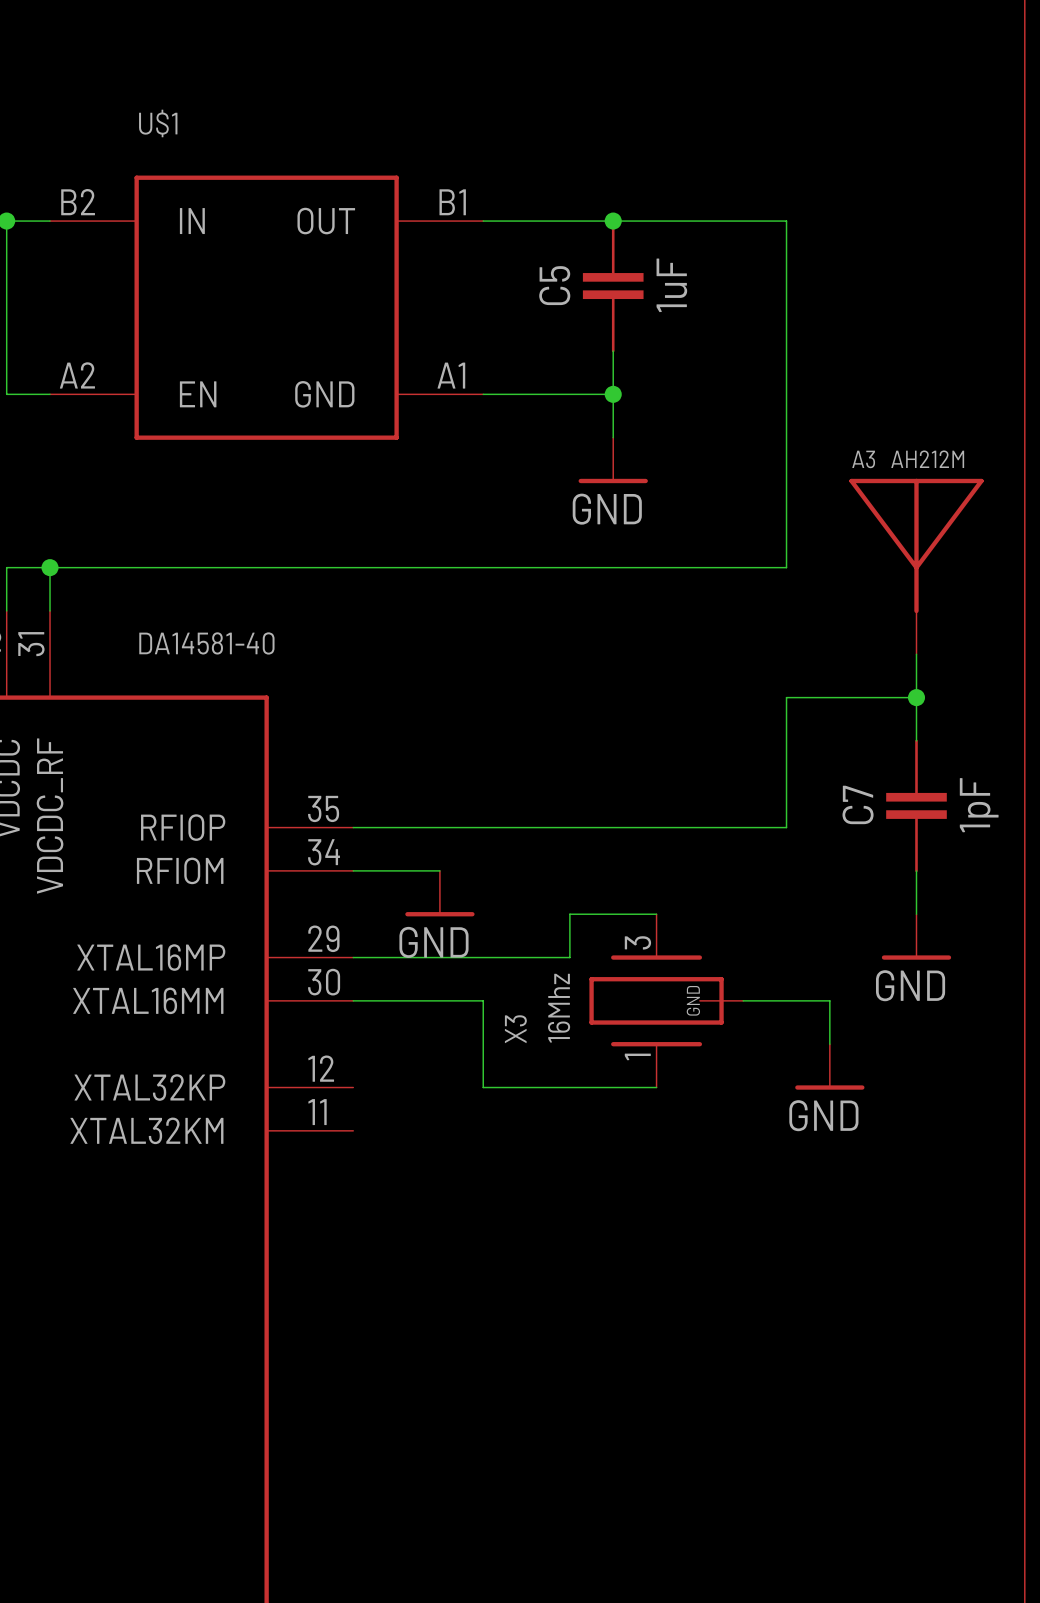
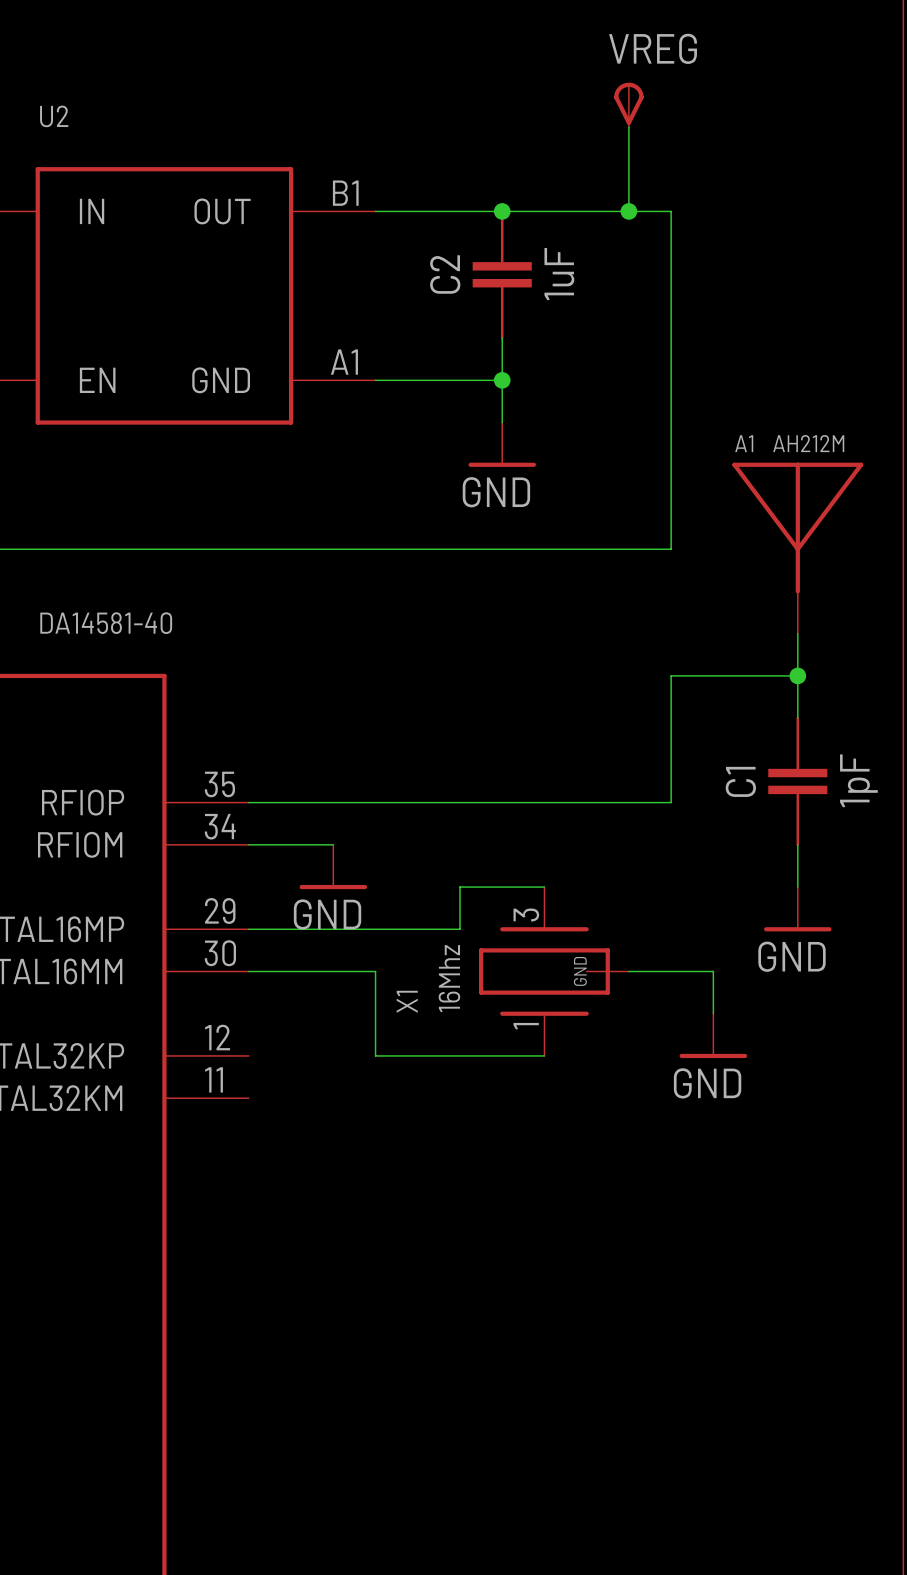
VREG: none -> (628, 104)
U$1 name: U$1 (158, 123) -> U2 (54, 116)
wire: none -> (628, 126) (628, 211)
junction: none -> (628, 211)
C5 name: C5 (554, 285) -> C2 (445, 274)
A3 name: A3 (863, 459) -> A1 (744, 443)
C7 name: C7 (858, 804) -> C1 (740, 781)
X3 name: X3 (515, 1029) -> X1 (407, 1001)

